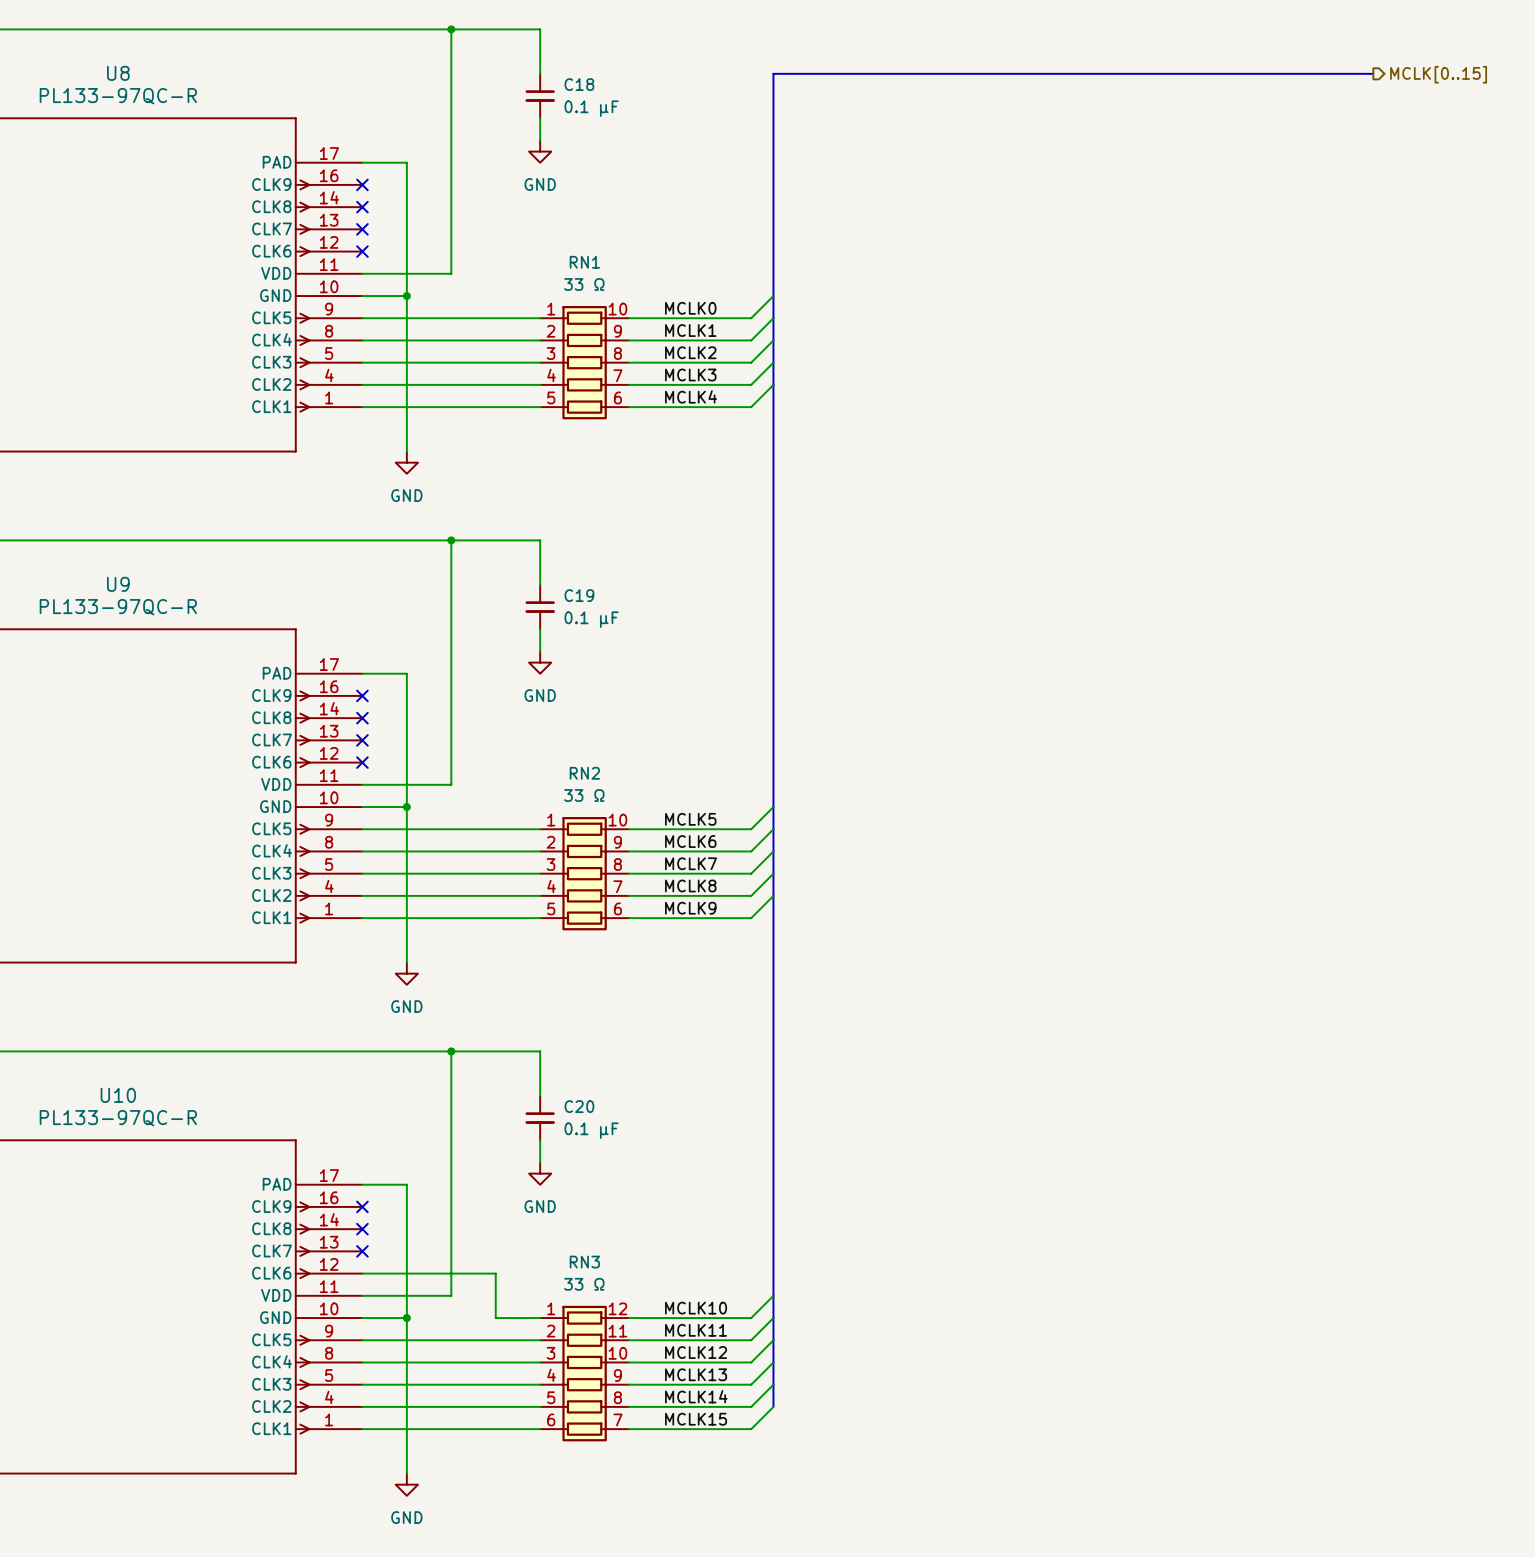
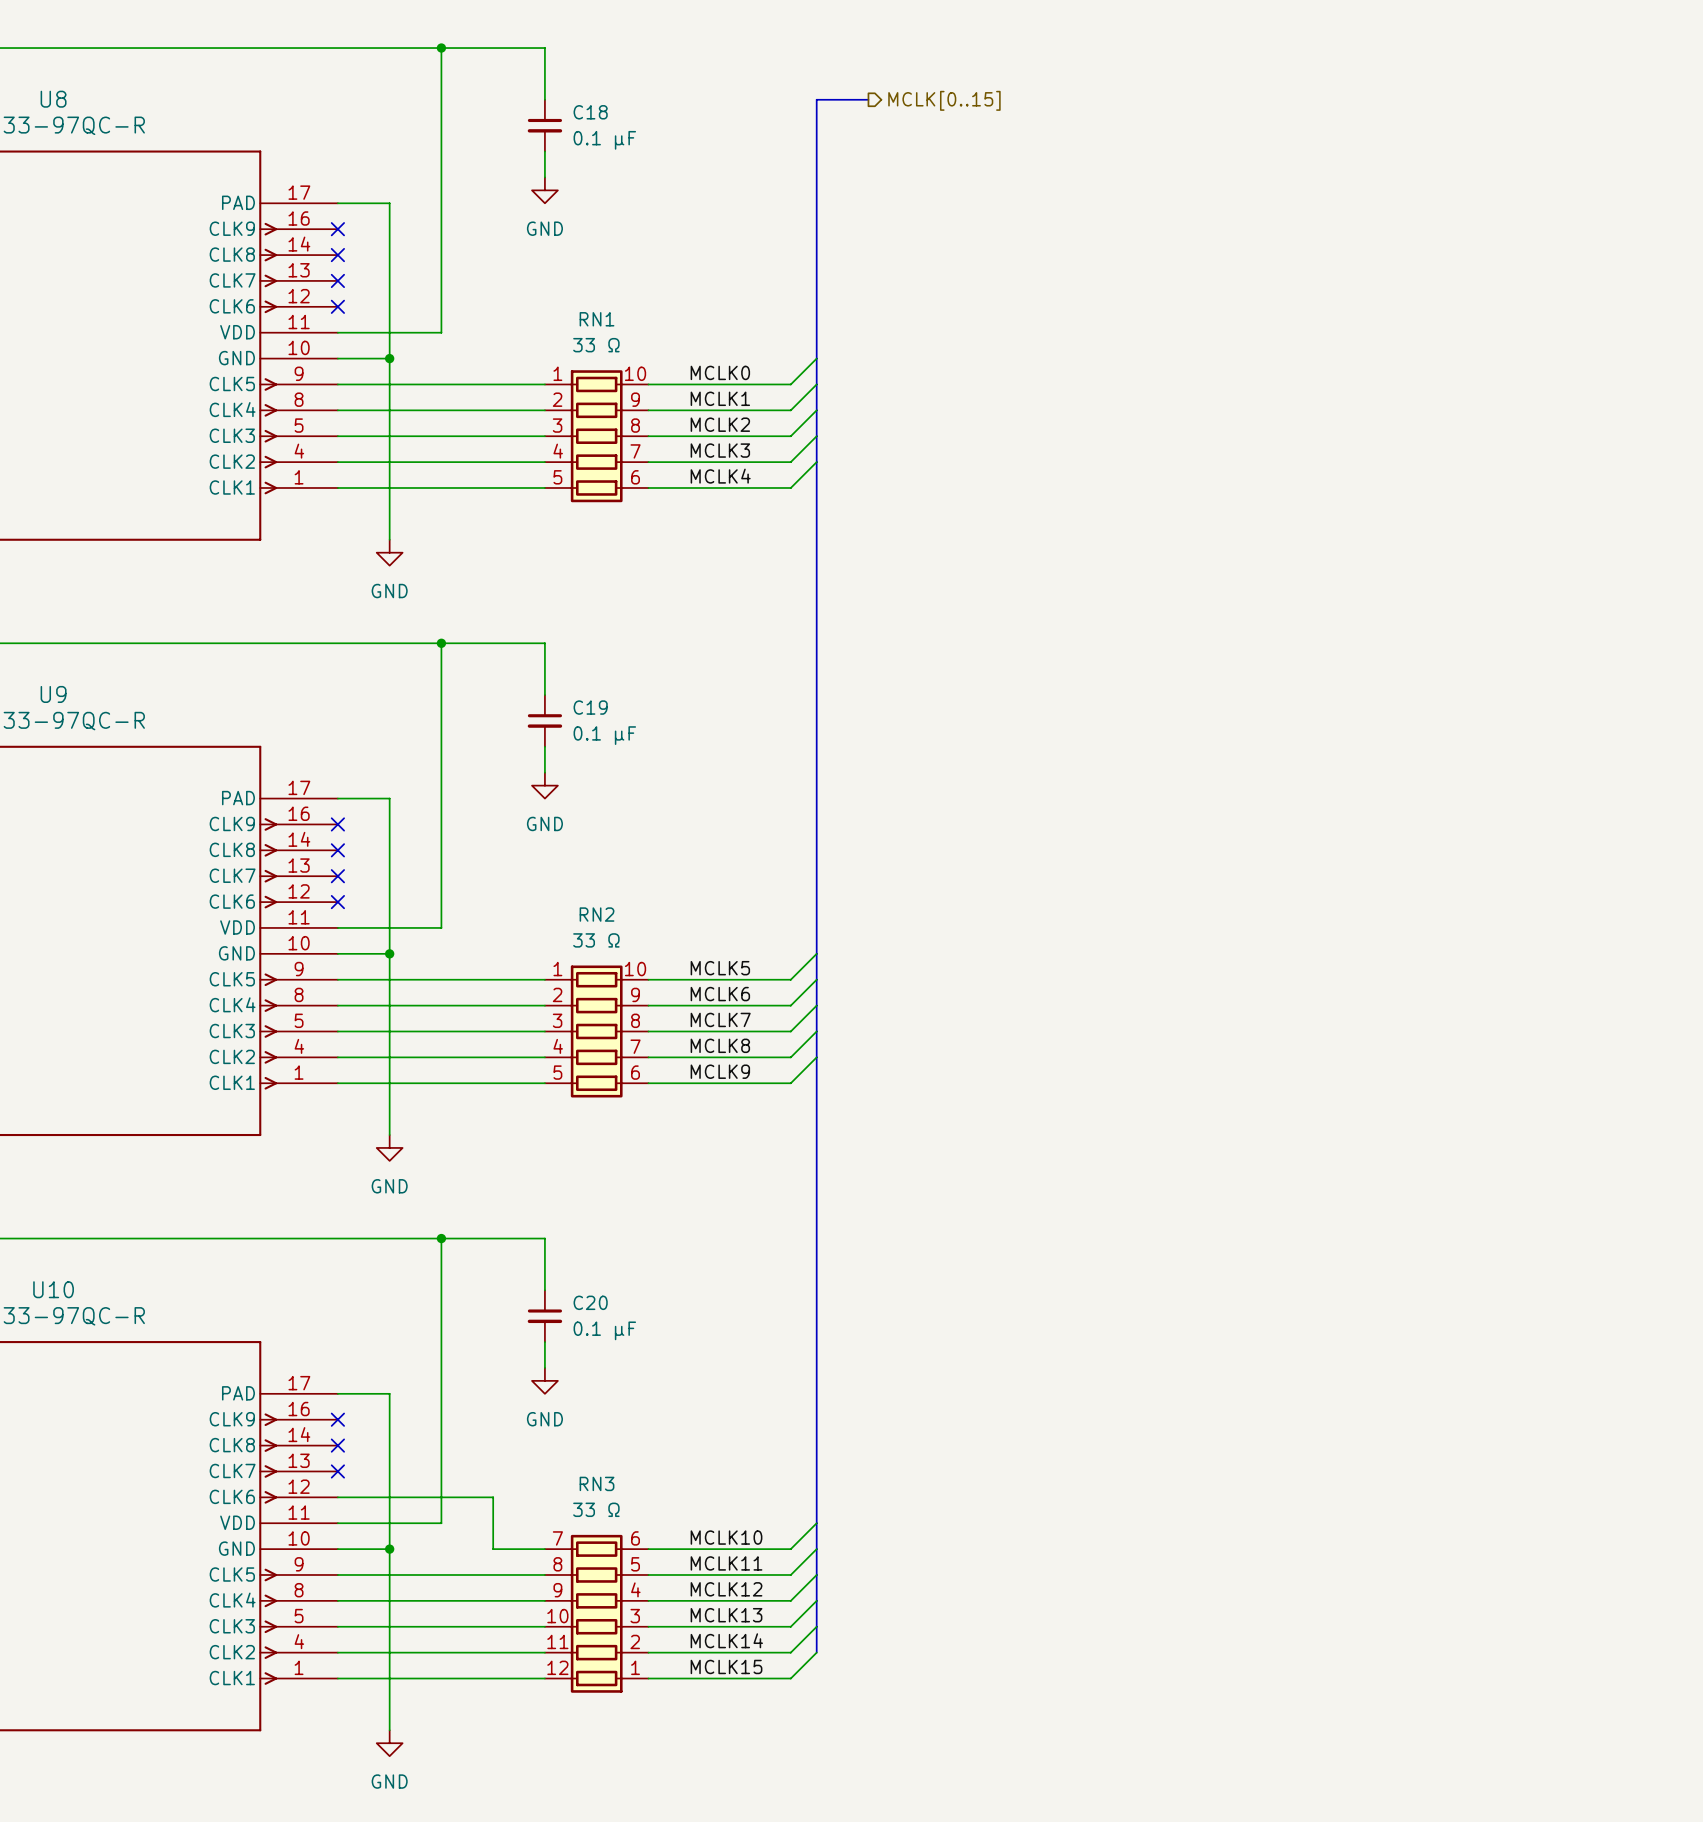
bus: (817, 73) (1373, 73) -> none
hierarchical label: none -> MCLK[0..15] (944, 100)
hierarchical label: MCLK[0..15] (1438, 74) -> none
RN3 rotation: 0° (584, 1373) -> 180° (596, 1613)

